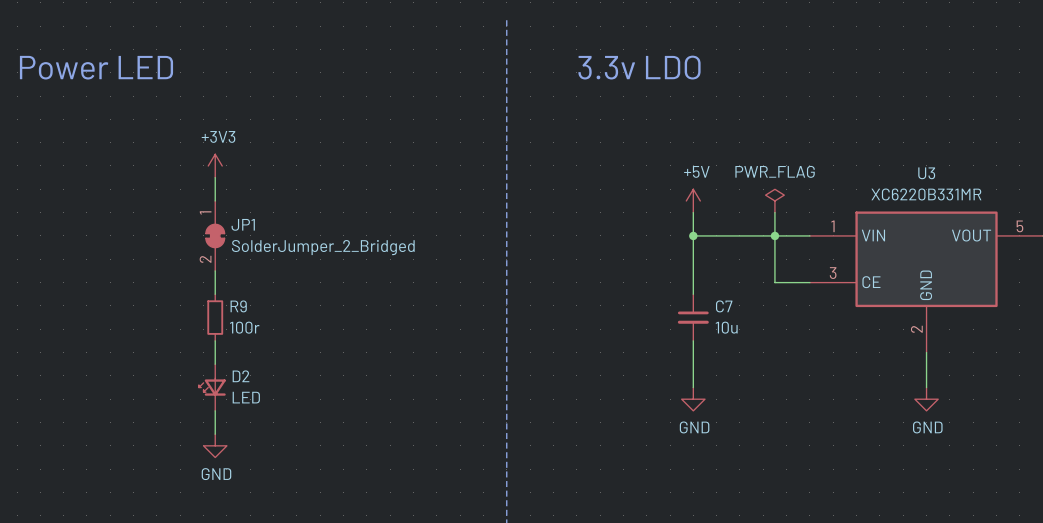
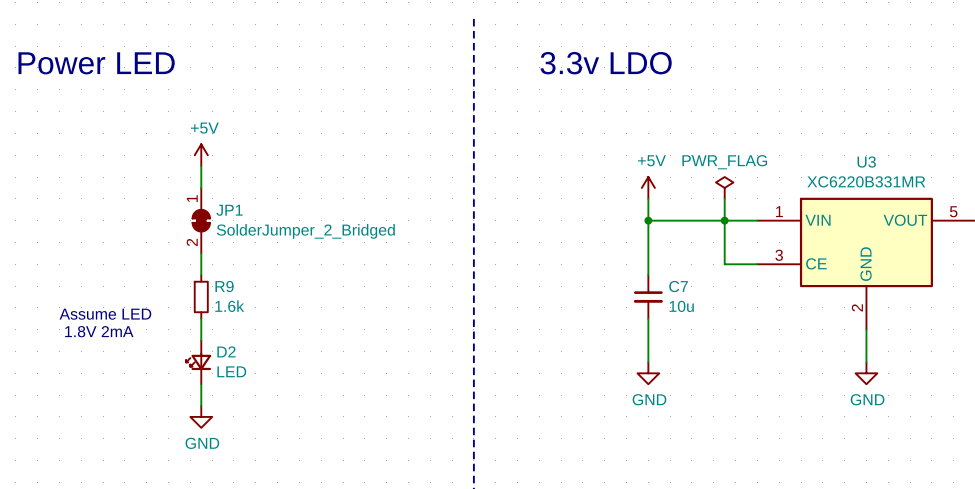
power symbol: +3V3 (215, 165) -> +5V (201, 155)
R9 value: 100r (244, 327) -> 1.6k (229, 306)
text: none -> Assume LED (105, 314)
text: none -> 1.8V 2mA (99, 331)

